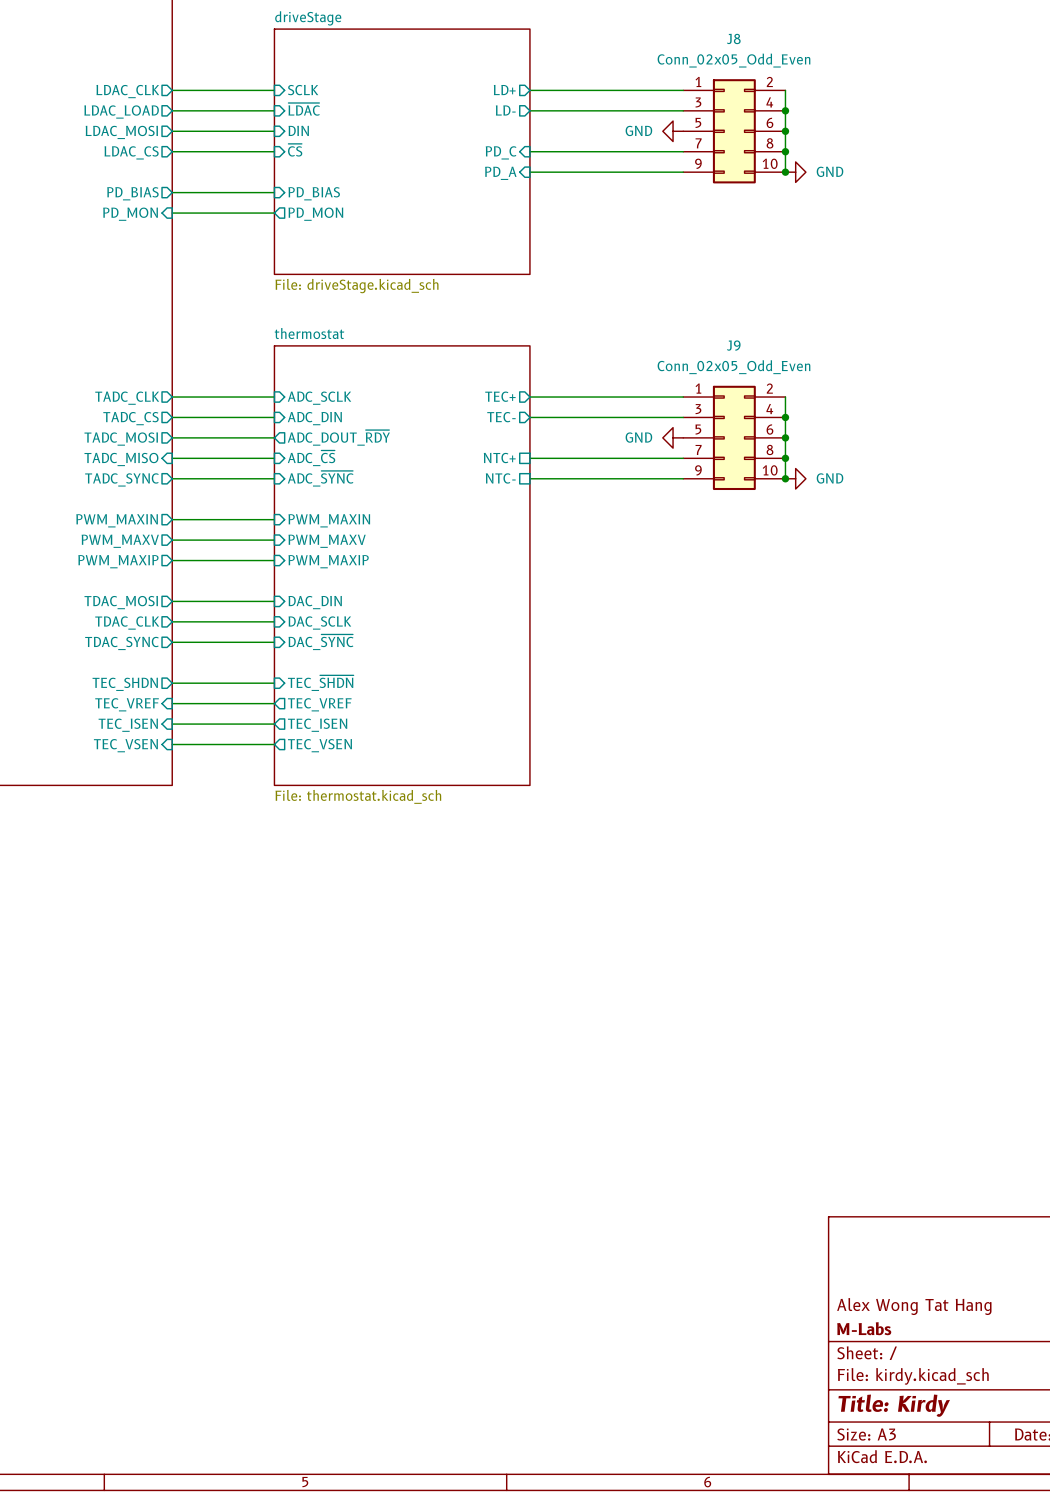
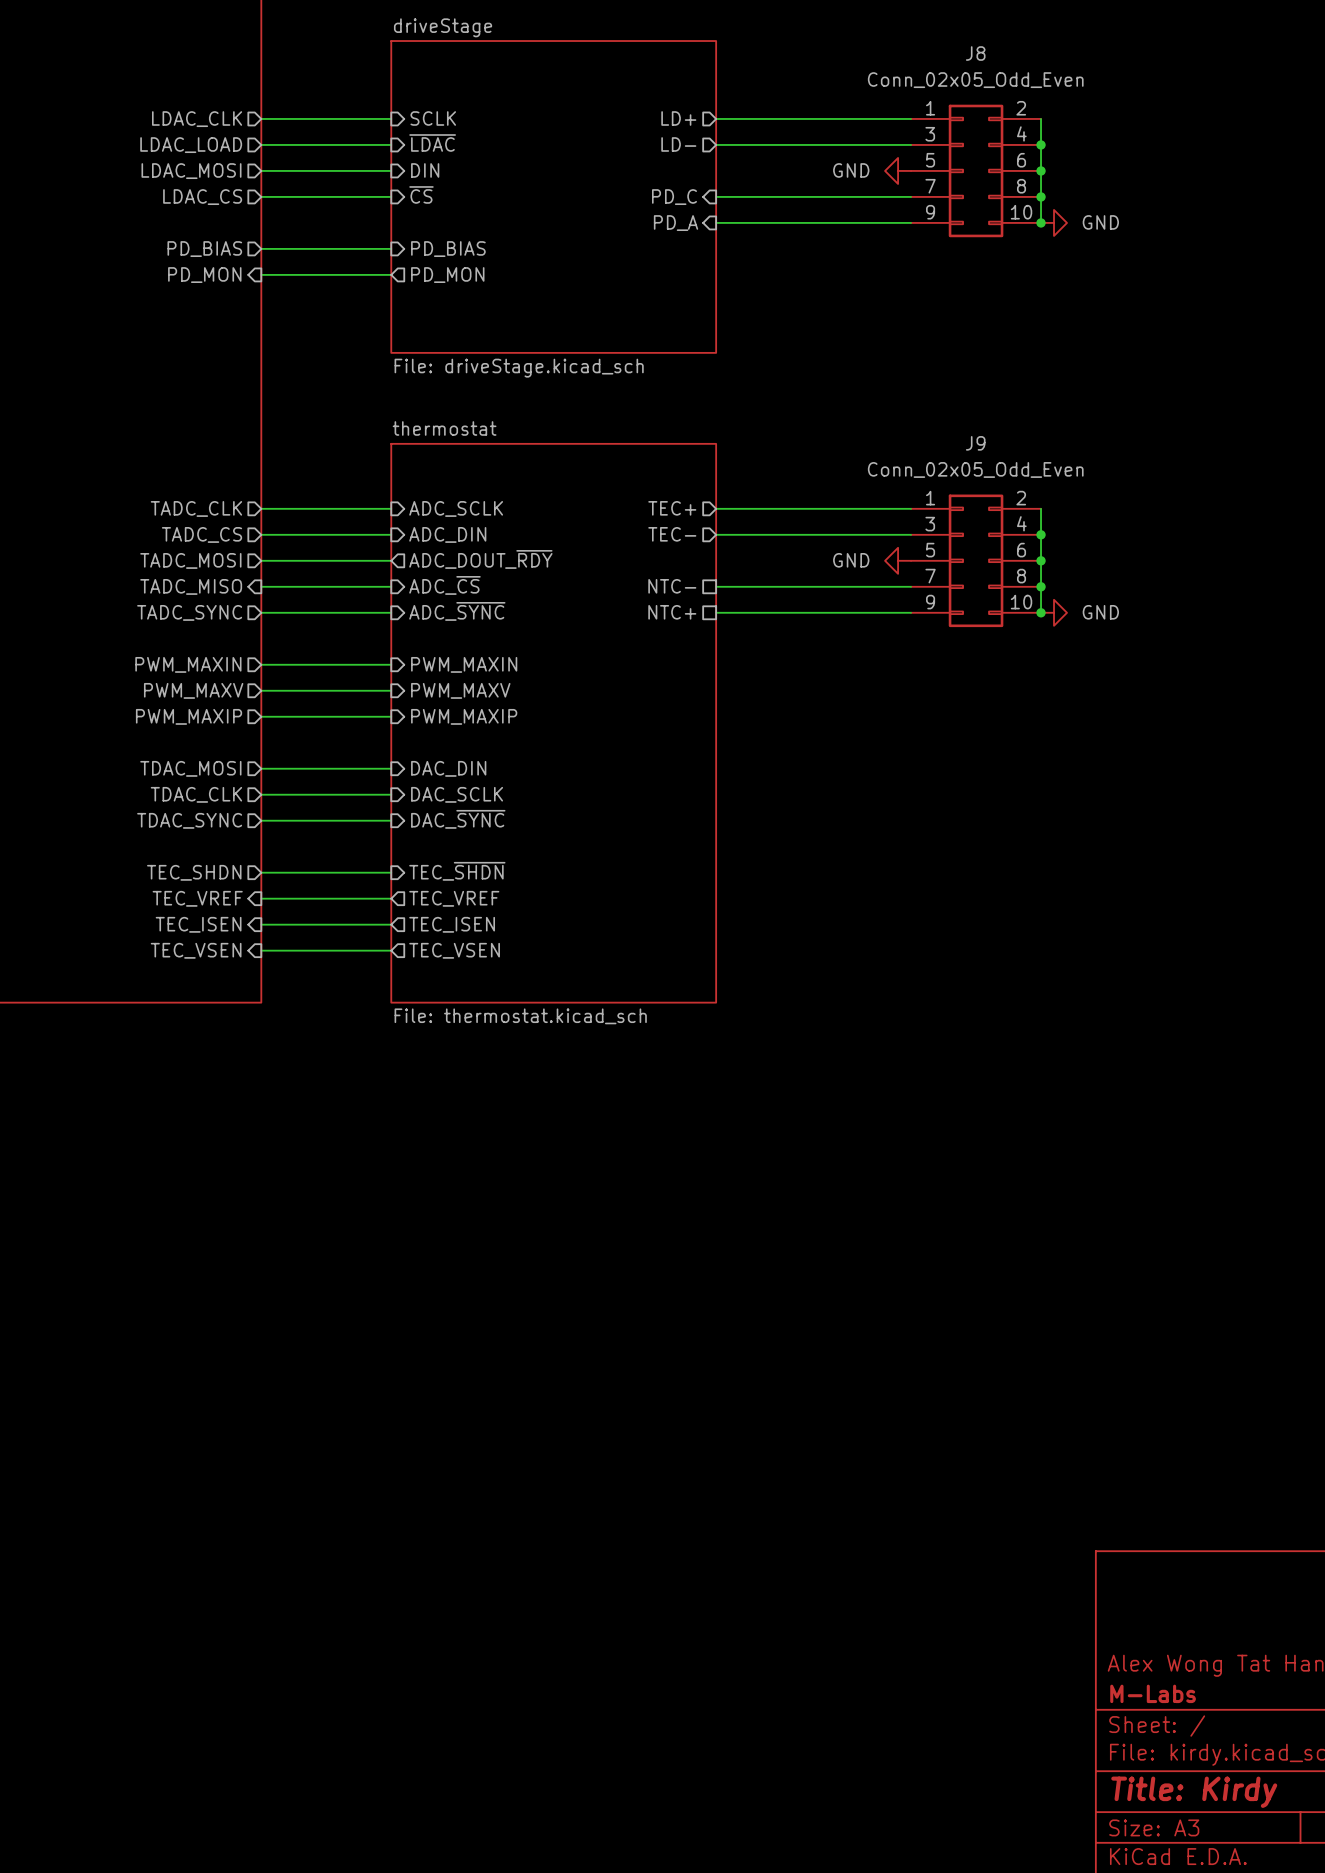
sheet pin: NTC+ (499, 458) -> NTC- (672, 586)
sheet pin: NTC- (500, 478) -> NTC+ (672, 612)

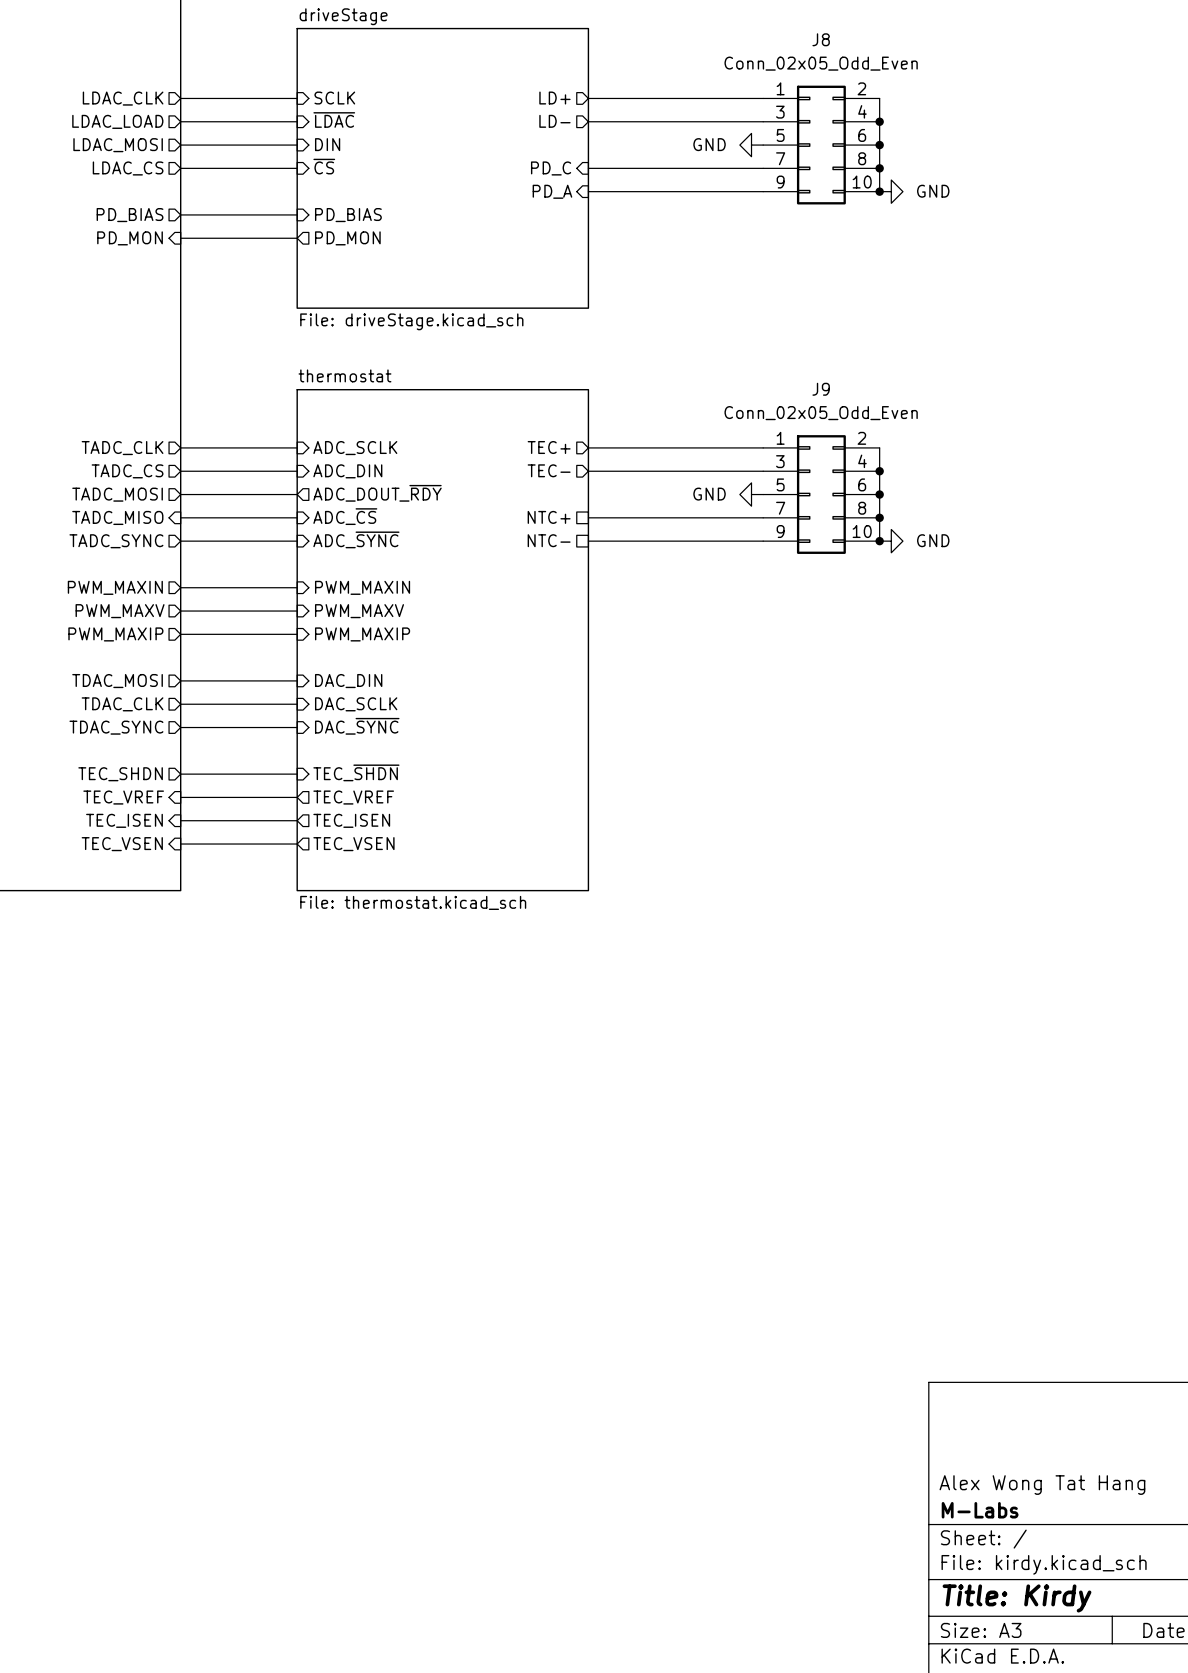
sheet pin: NTC- (672, 586) -> NTC+ (549, 517)
sheet pin: NTC+ (672, 612) -> NTC- (549, 540)

